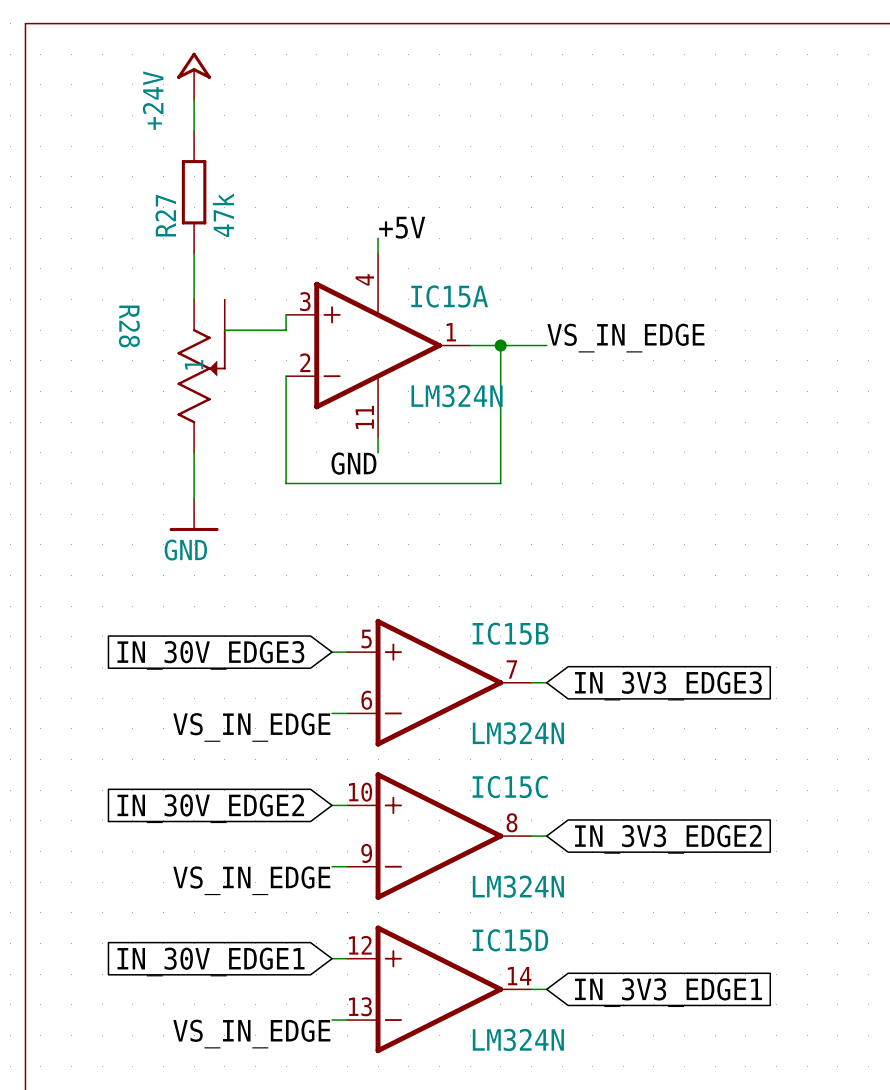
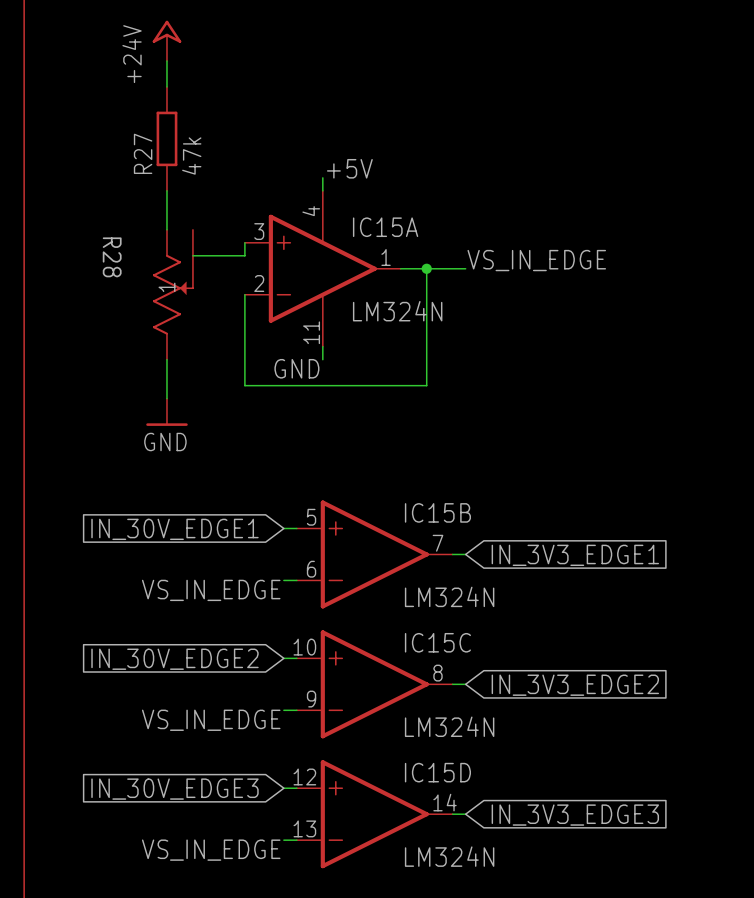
global label: IN_30V_EDGE3 (210, 655) -> IN_30V_EDGE1 (174, 529)
global label: IN_3V3_EDGE3 (668, 686) -> IN_3V3_EDGE1 (575, 555)
global label: IN_30V_EDGE1 (211, 961) -> IN_30V_EDGE3 (174, 789)
global label: IN_3V3_EDGE1 (668, 992) -> IN_3V3_EDGE3 (575, 815)

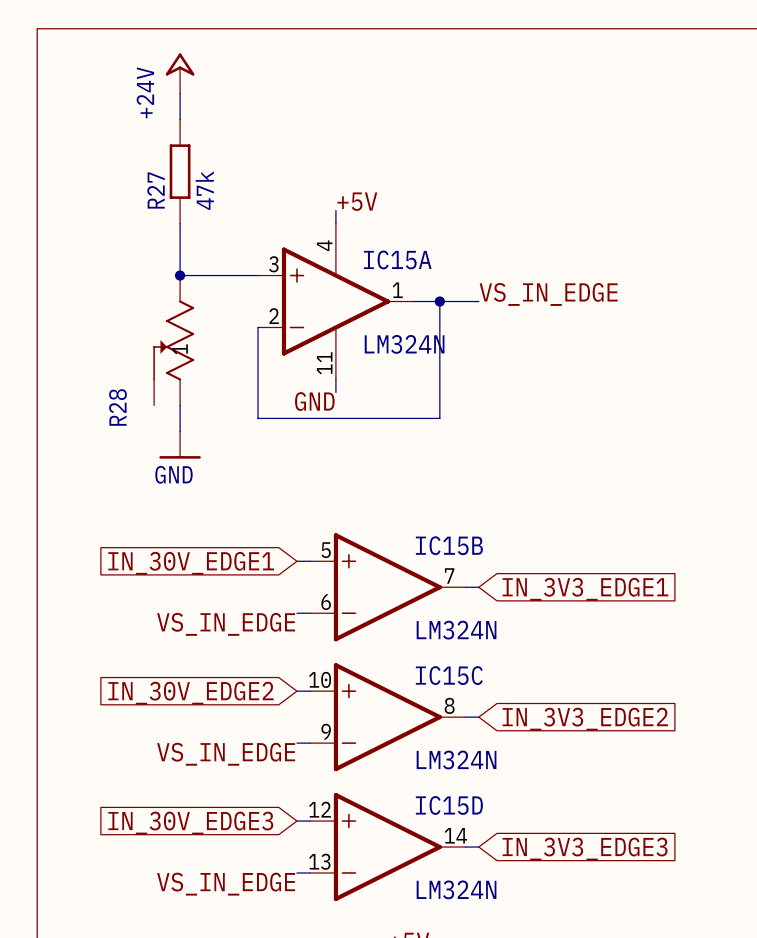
junction: none -> (180, 275)
wire: (244, 242) (244, 255) (192, 255) -> (258, 275) (180, 275) (180, 262)
R28 name position: R28 (112, 257) -> R28 (117, 407)
R28 rotation: 0° (173, 294) -> 180° (173, 340)

